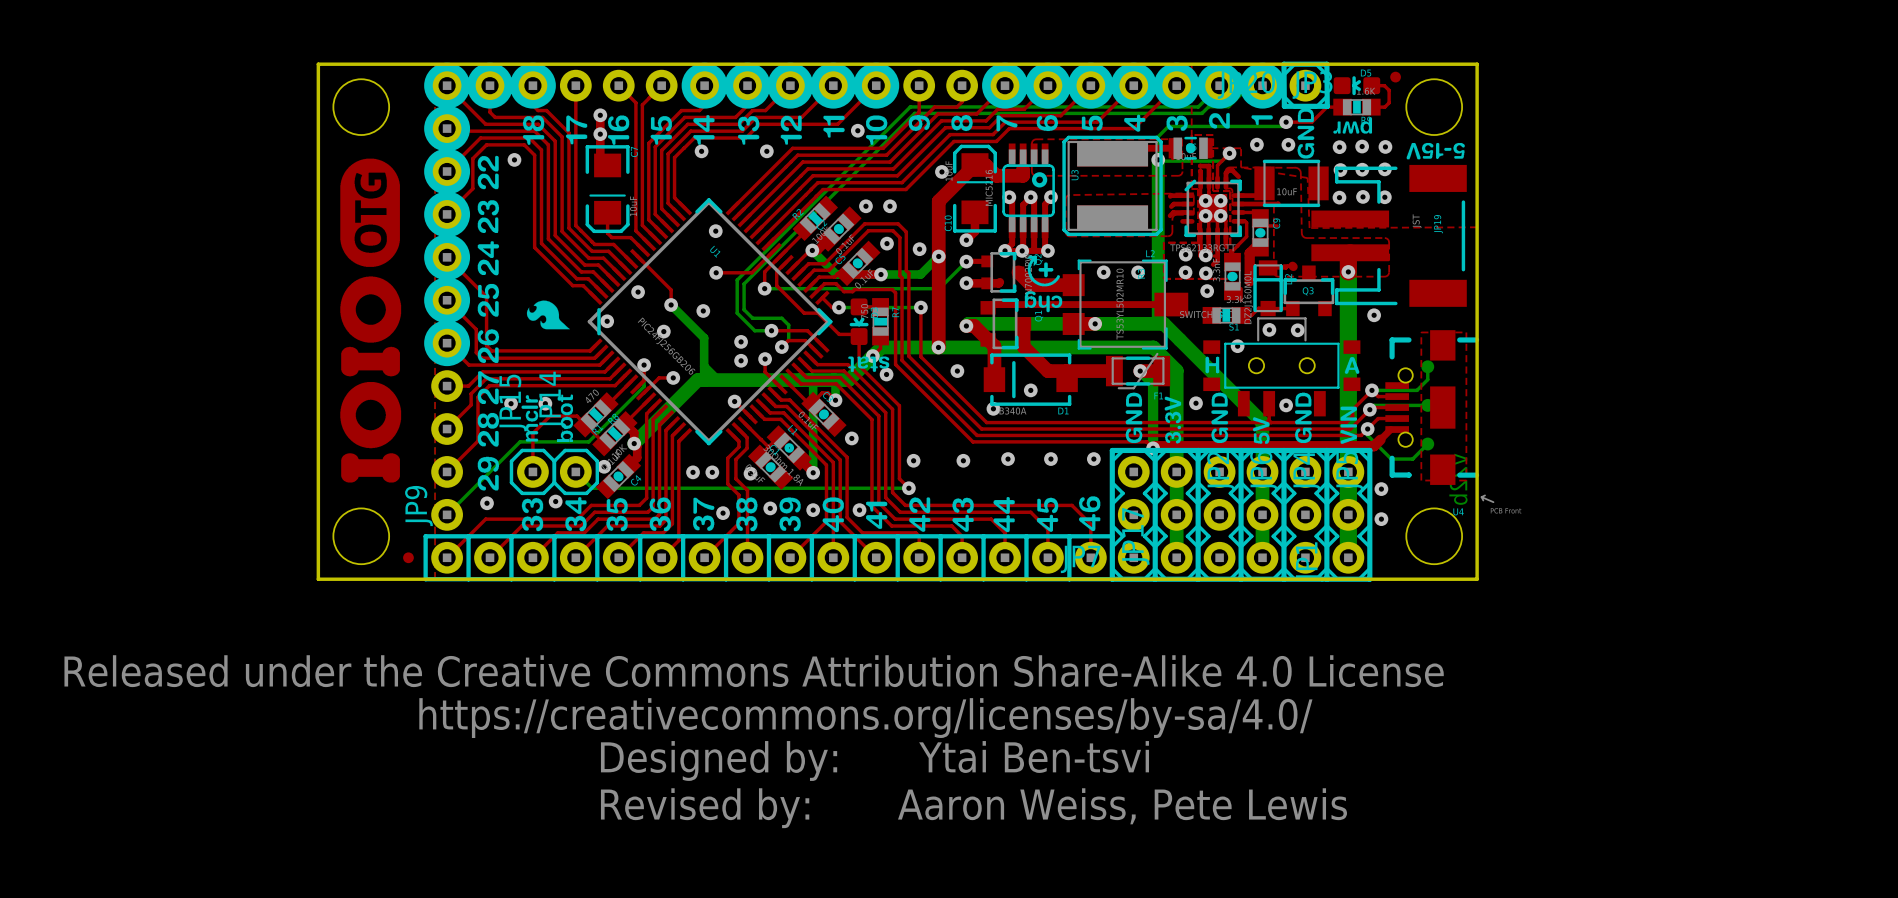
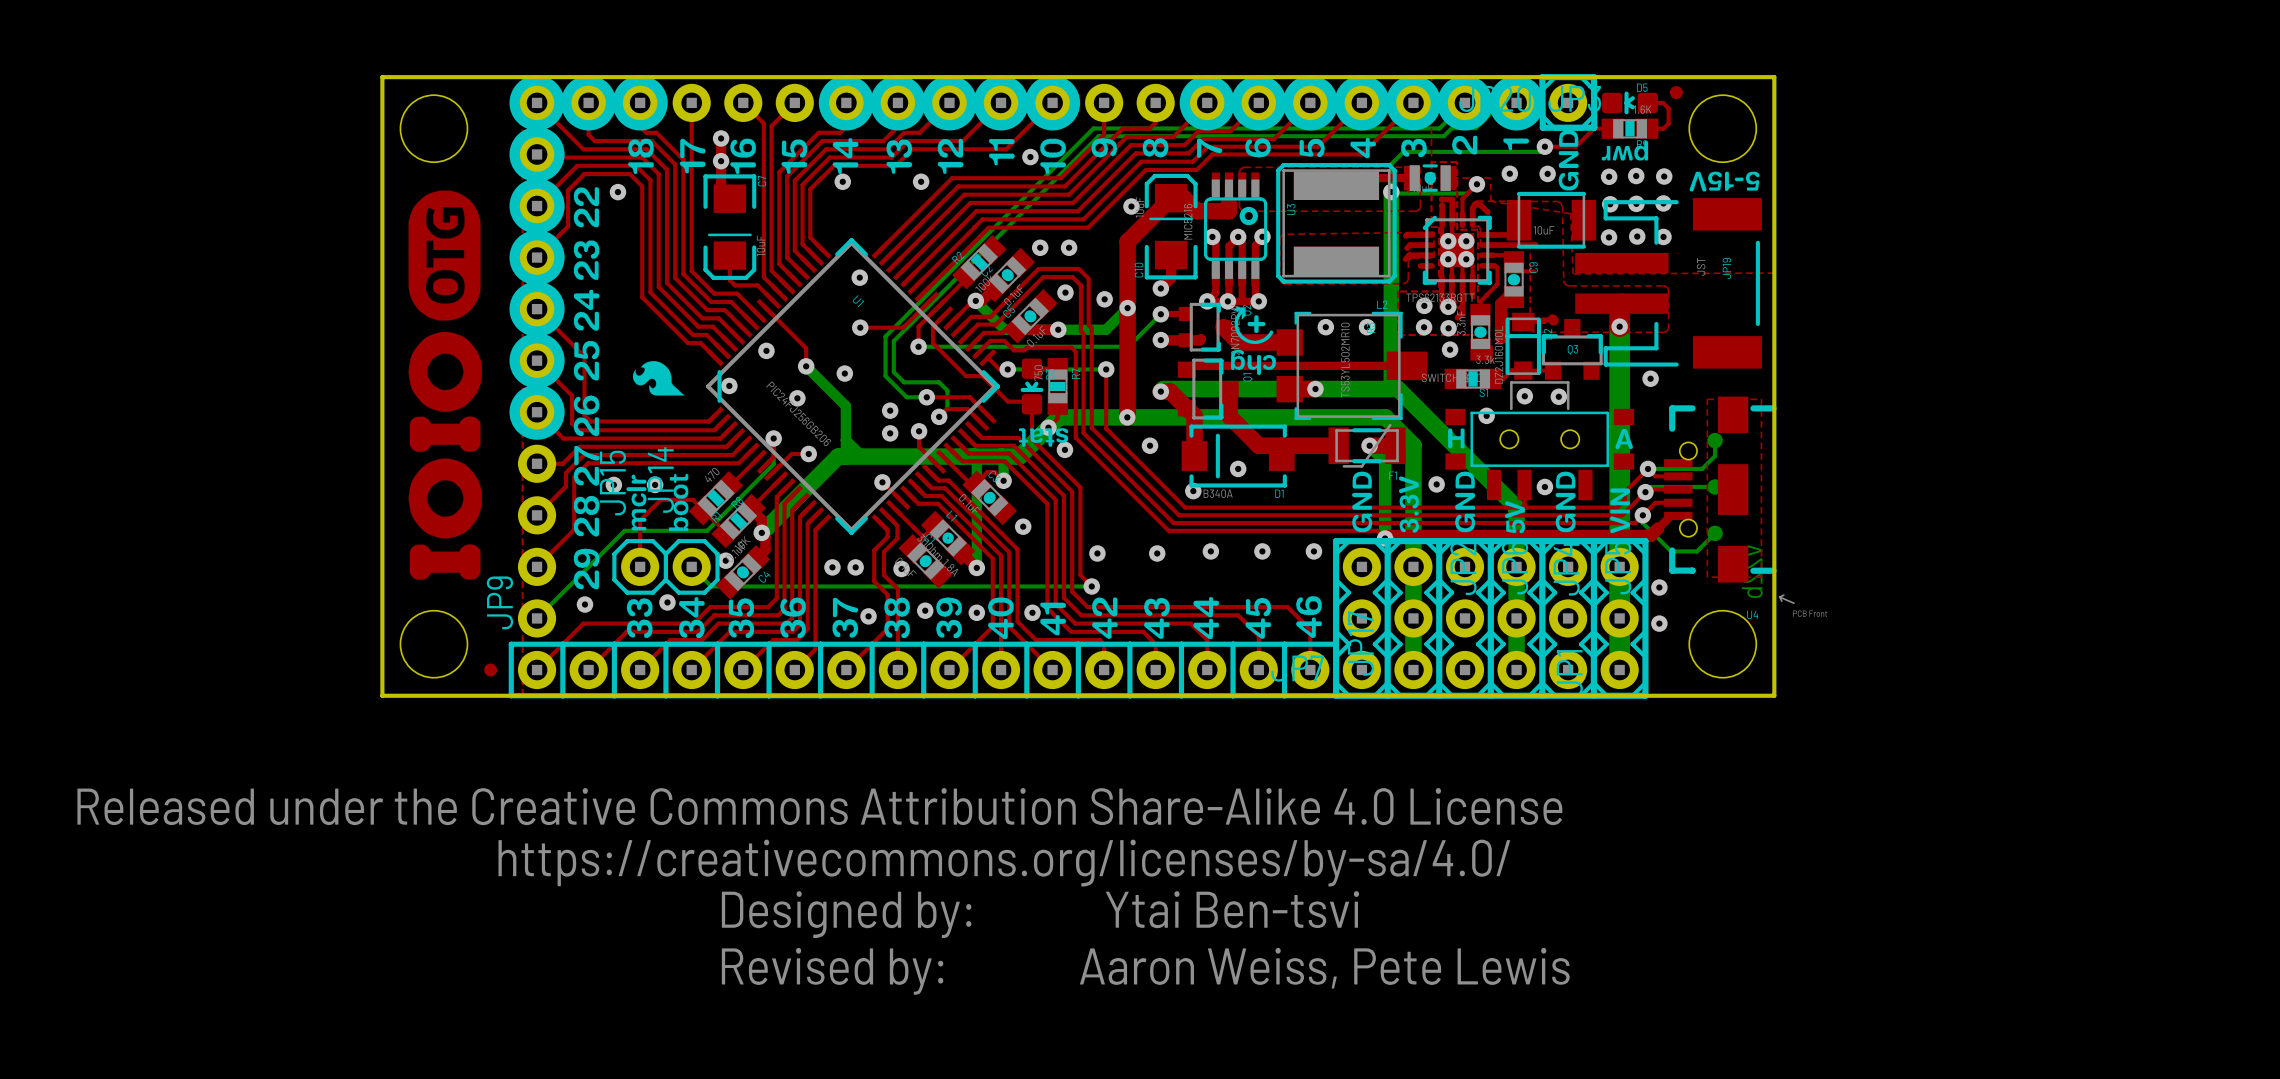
drawing shape: [340, 158, 402, 483] -> [408, 190, 482, 580]

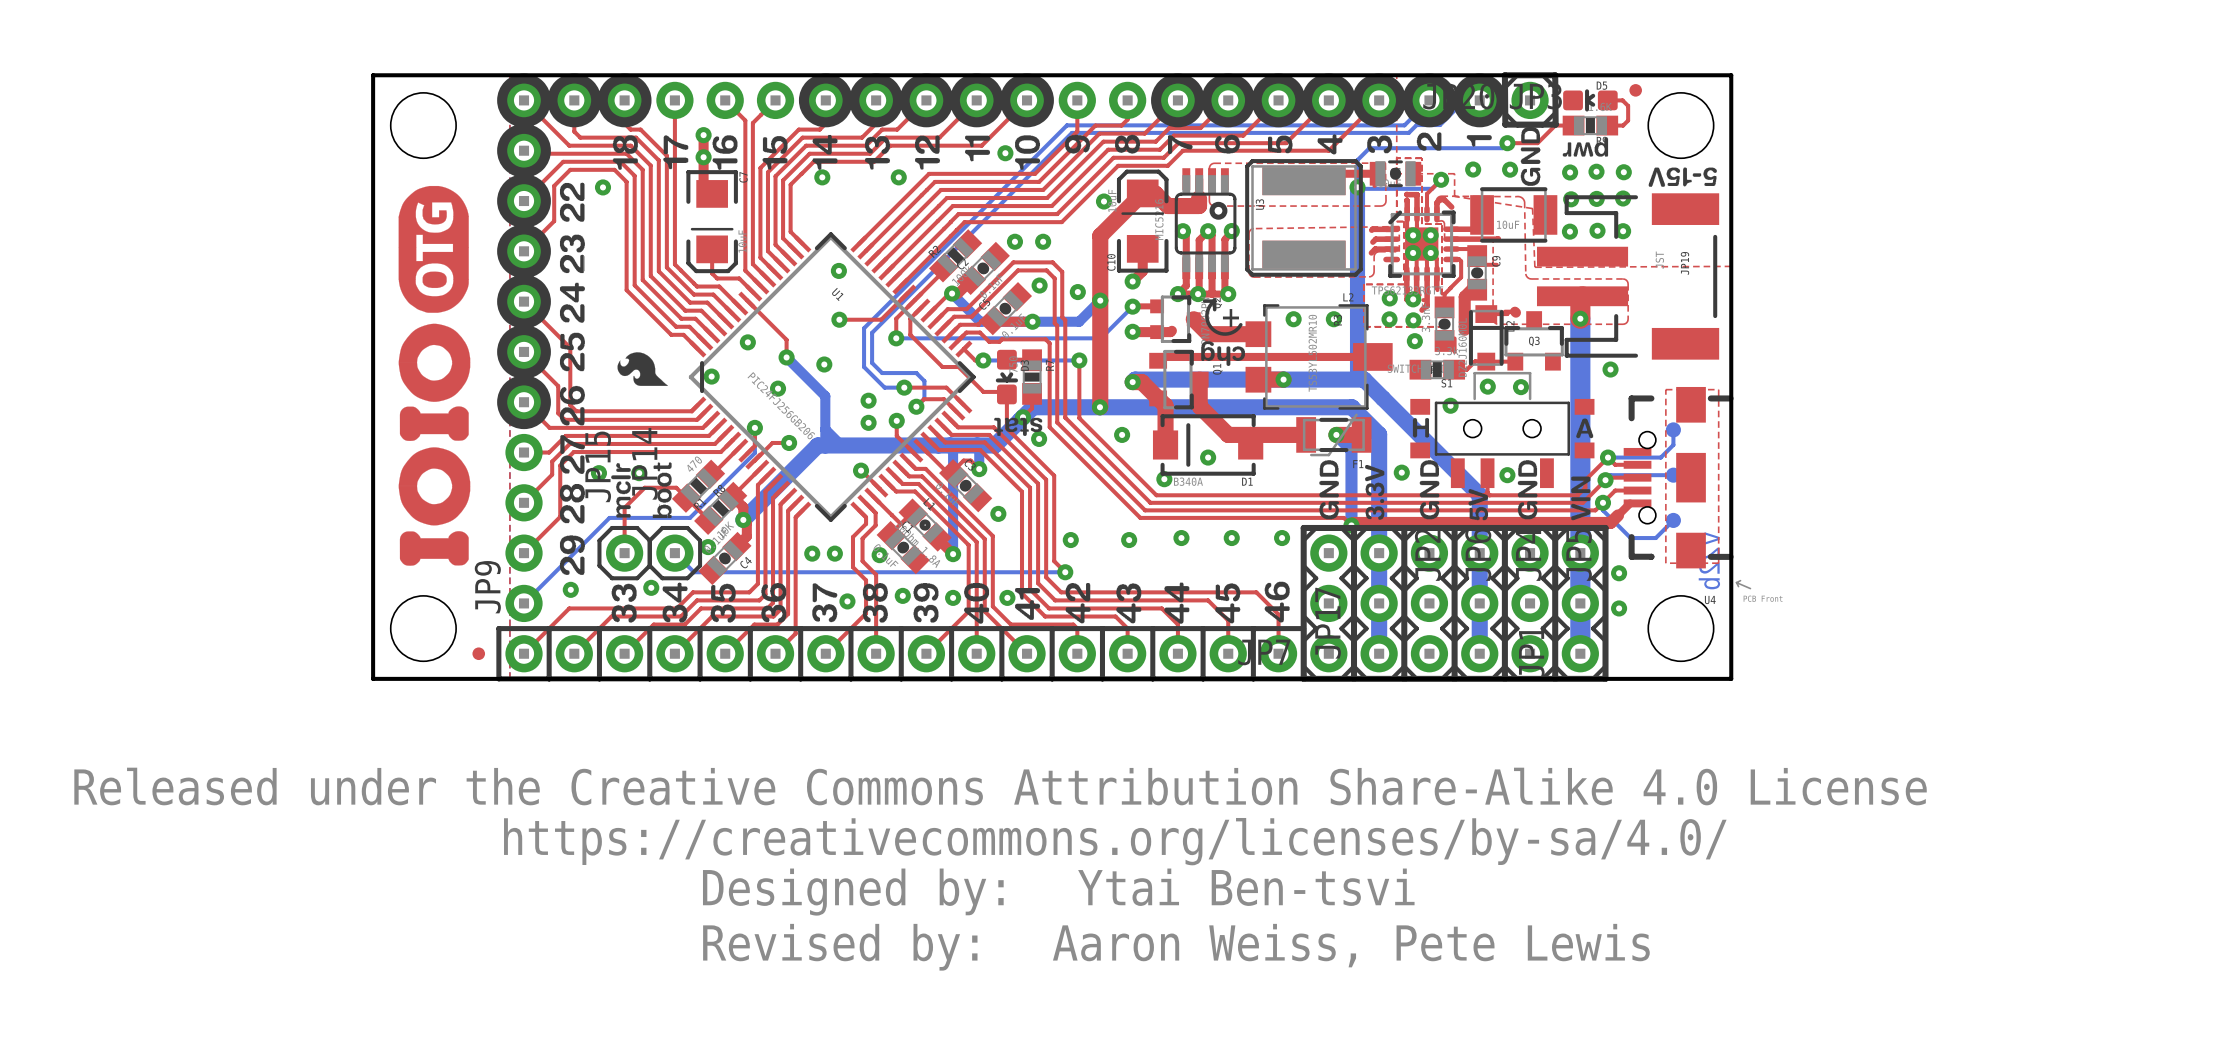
drawing: [1233, 307, 1274, 344] -> none
line: none -> (1204, 301) (1214, 301)
line: none -> (1214, 301) (1214, 309)
line: none -> (1214, 301) (1208, 308) (1206, 314) (1207, 321) (1212, 329) (1218, 332) (1227, 333) (1236, 330) (1240, 324)
text: none -> + (1230, 317)

